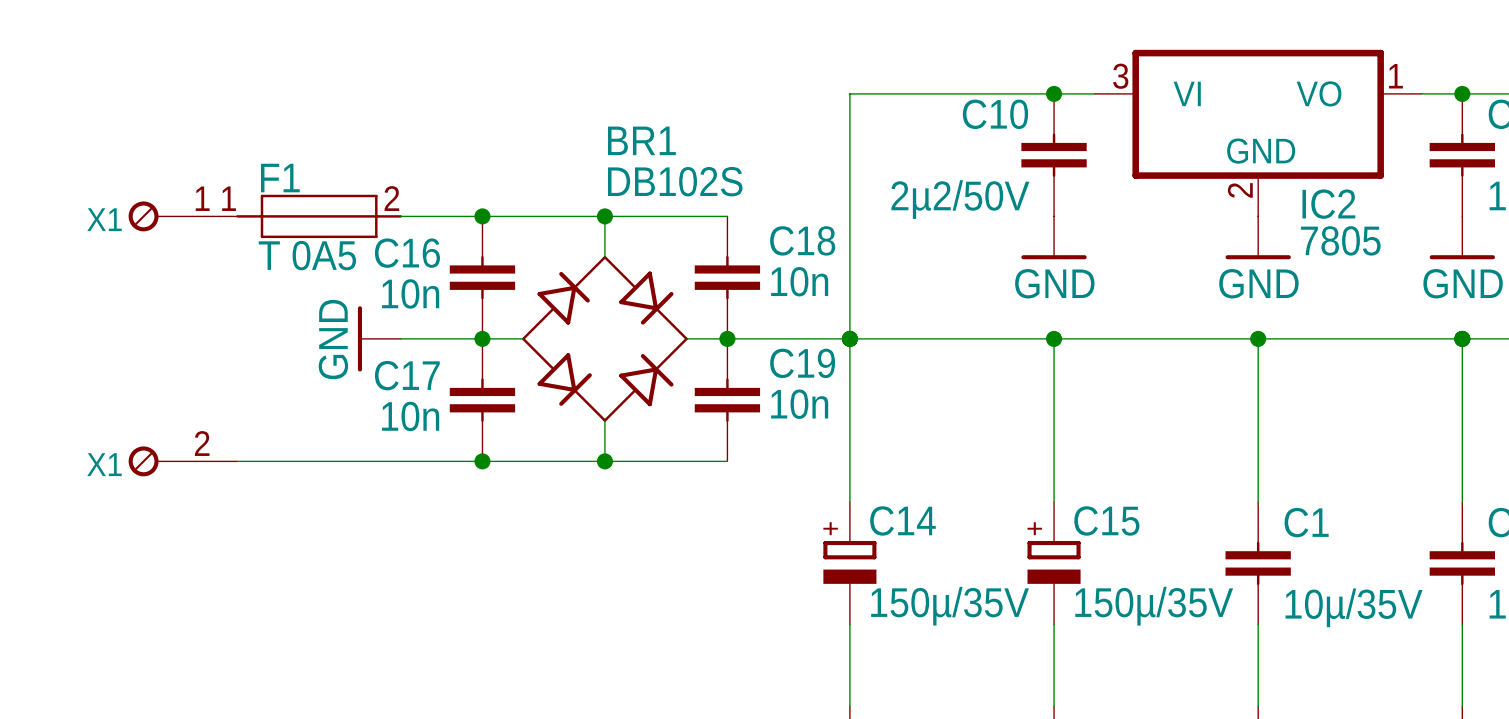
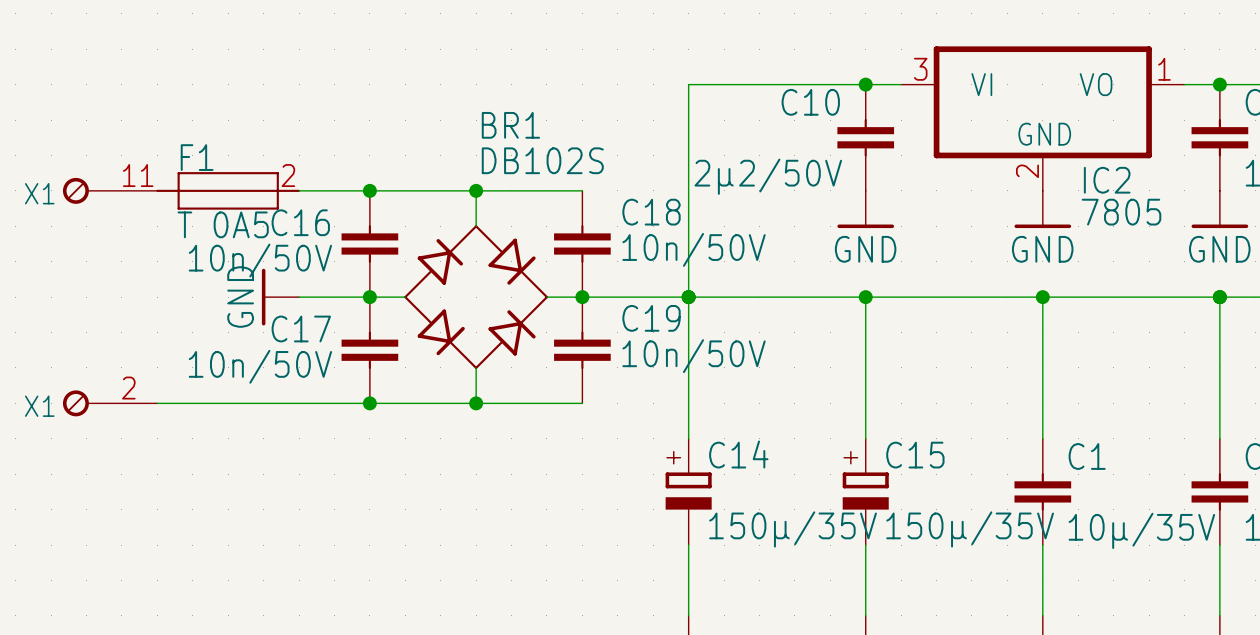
C18 value: 10n (799, 281) -> 10n/50V (694, 249)
C16 value: 10n (410, 293) -> 10n/50V (260, 260)
C19 value: 10n (799, 404) -> 10n/50V (694, 356)
C17 value: 10n (410, 416) -> 10n/50V (260, 366)

